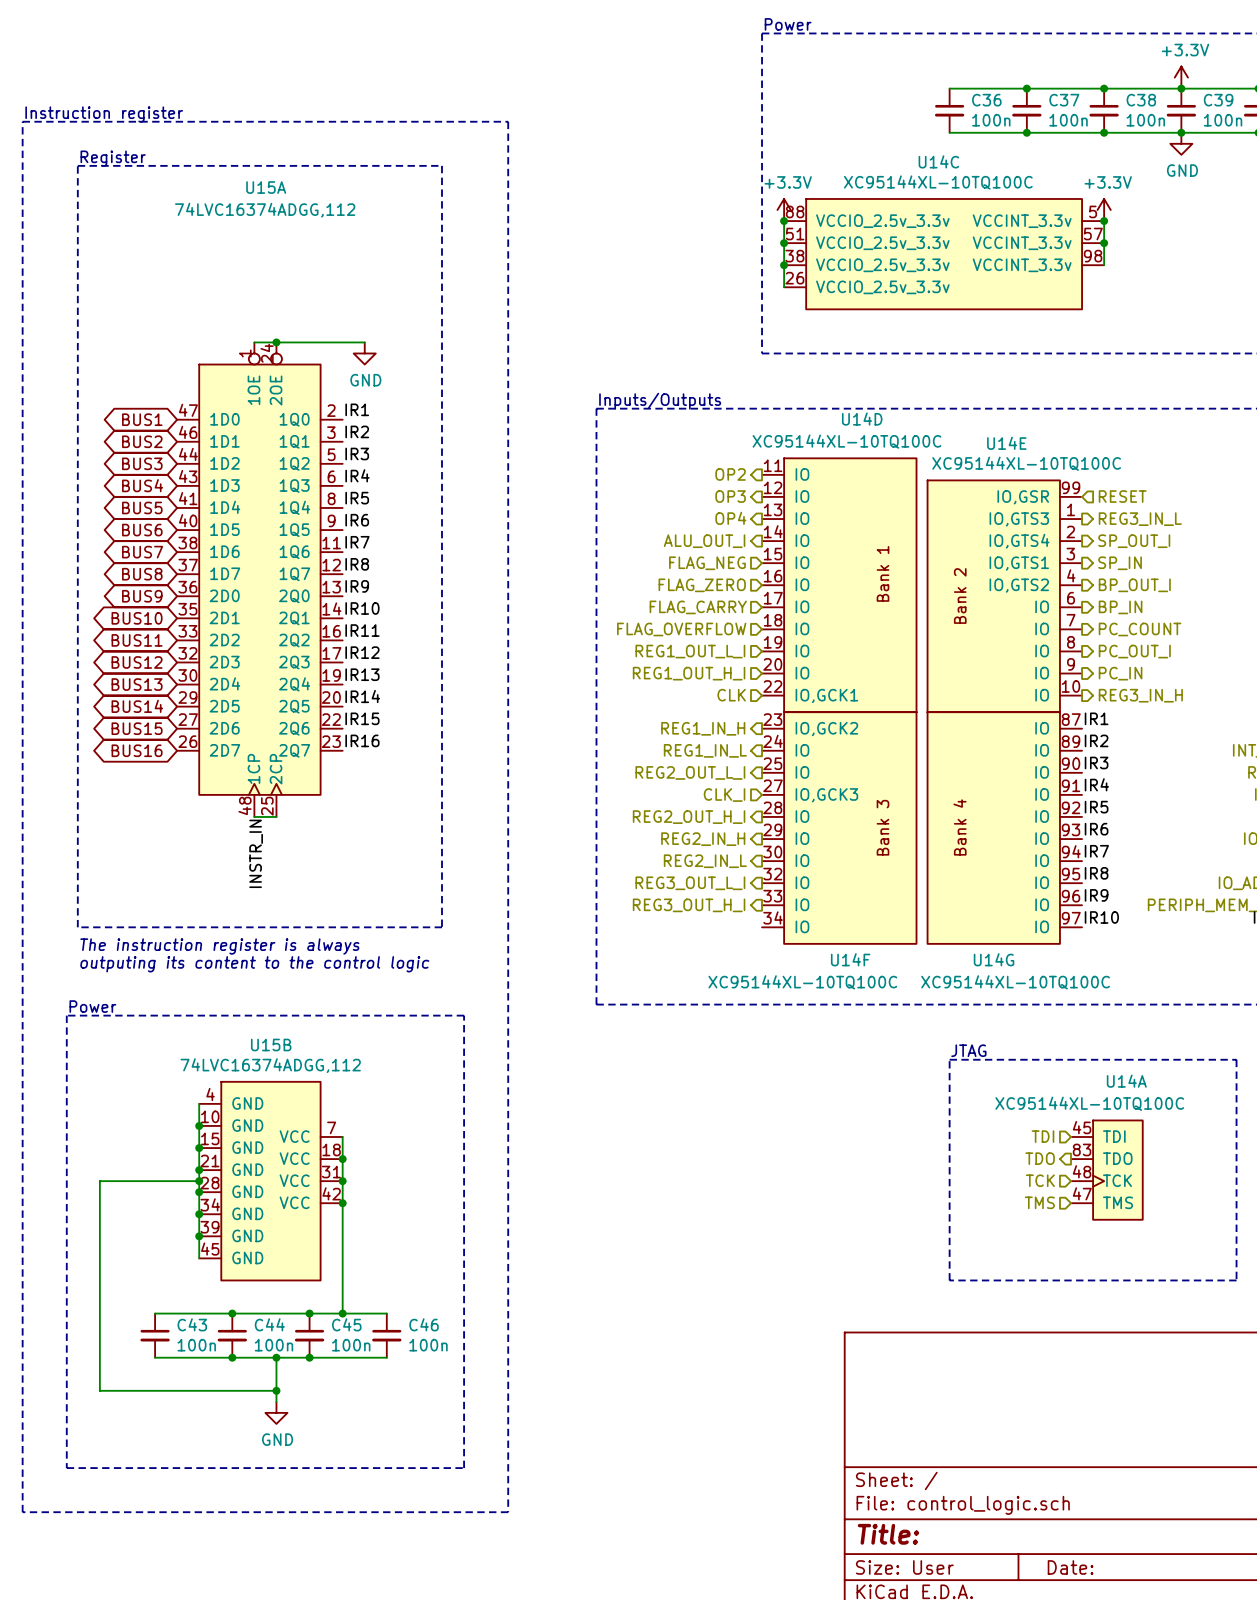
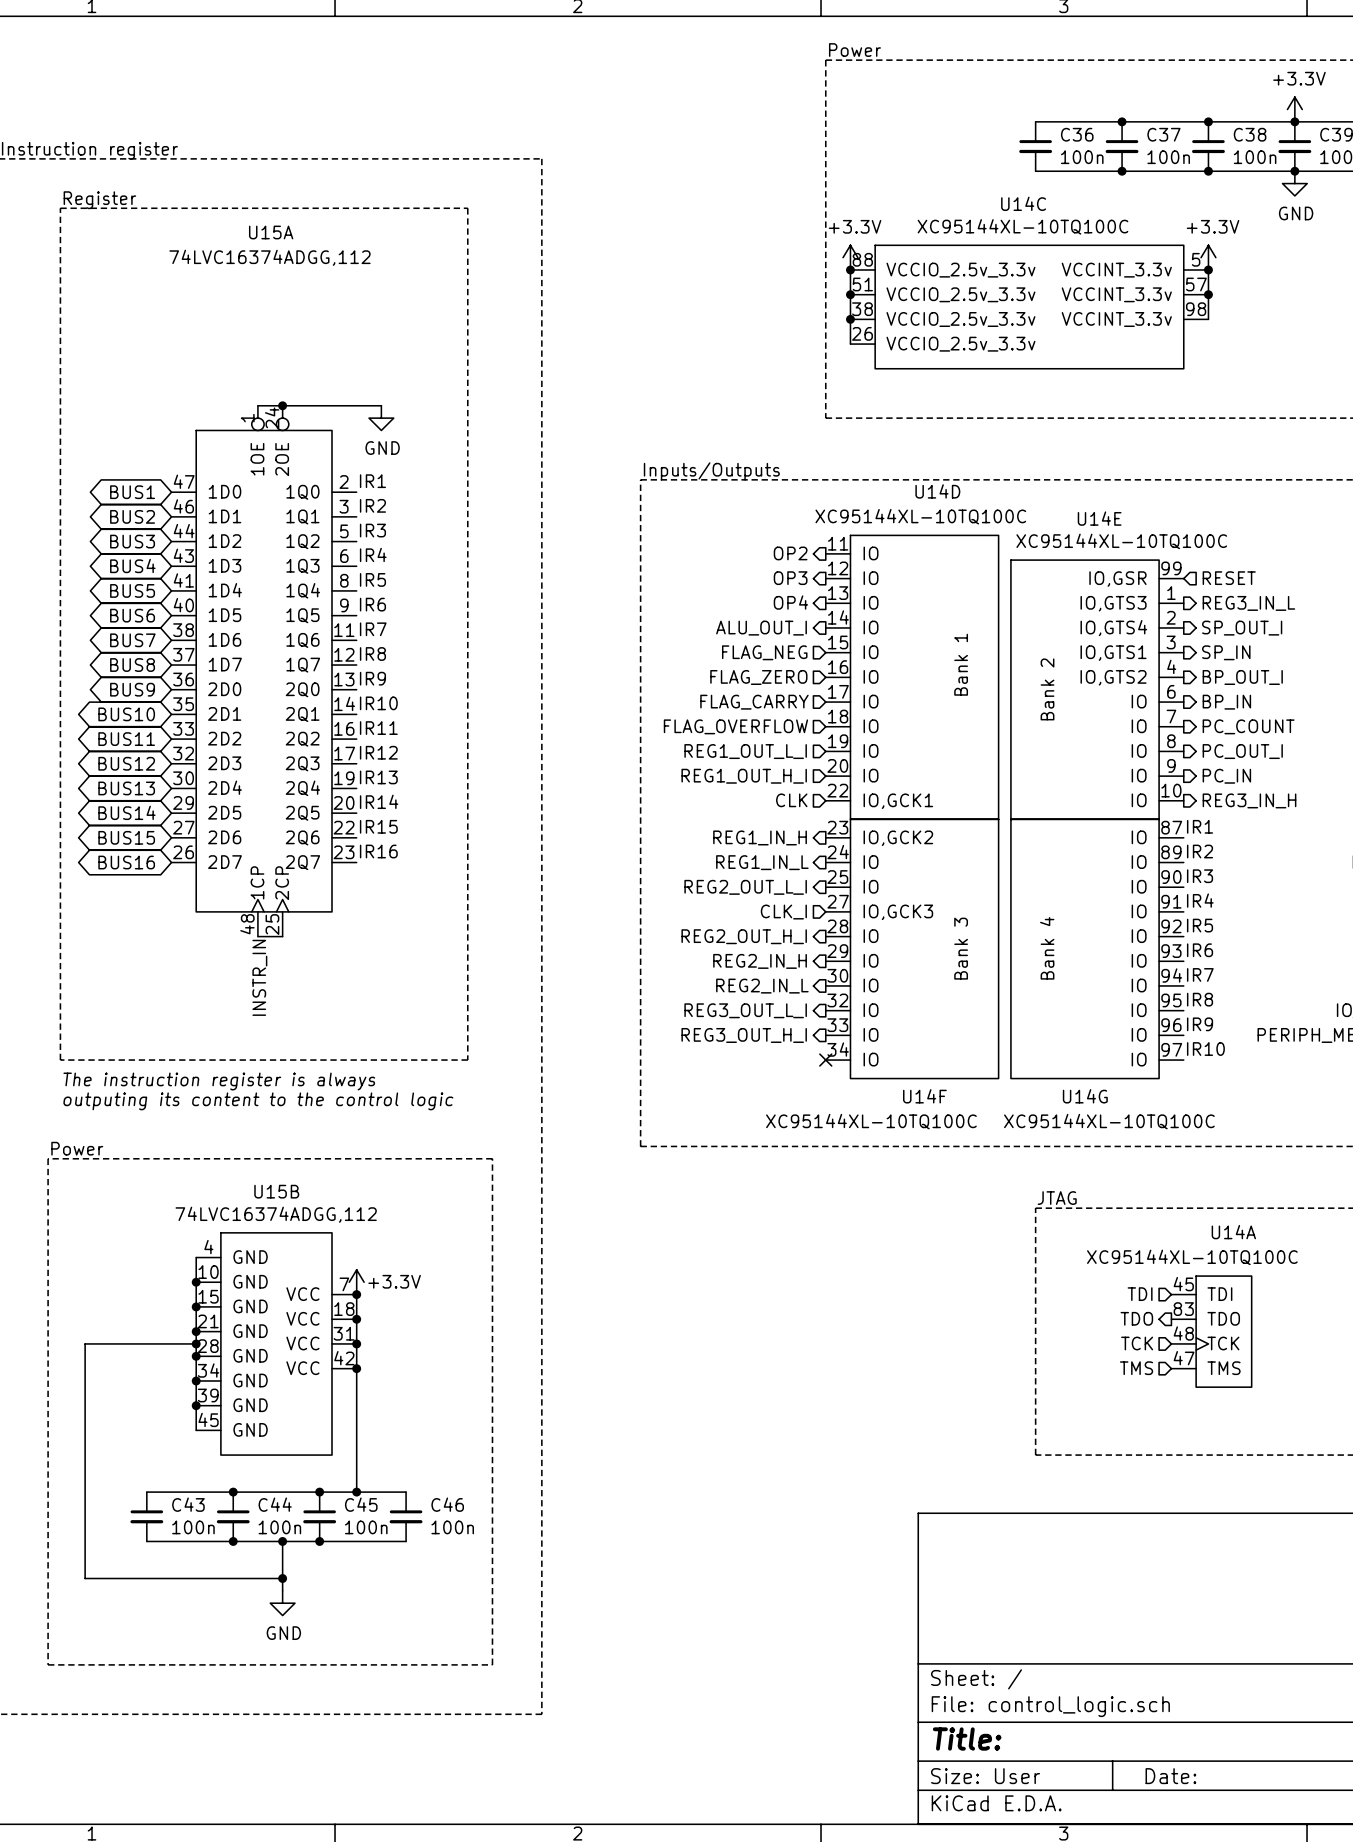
no-connect mark: none -> (825, 1060)
power symbol: none -> +3.3V (356, 1282)
junction: none -> (356, 1294)

